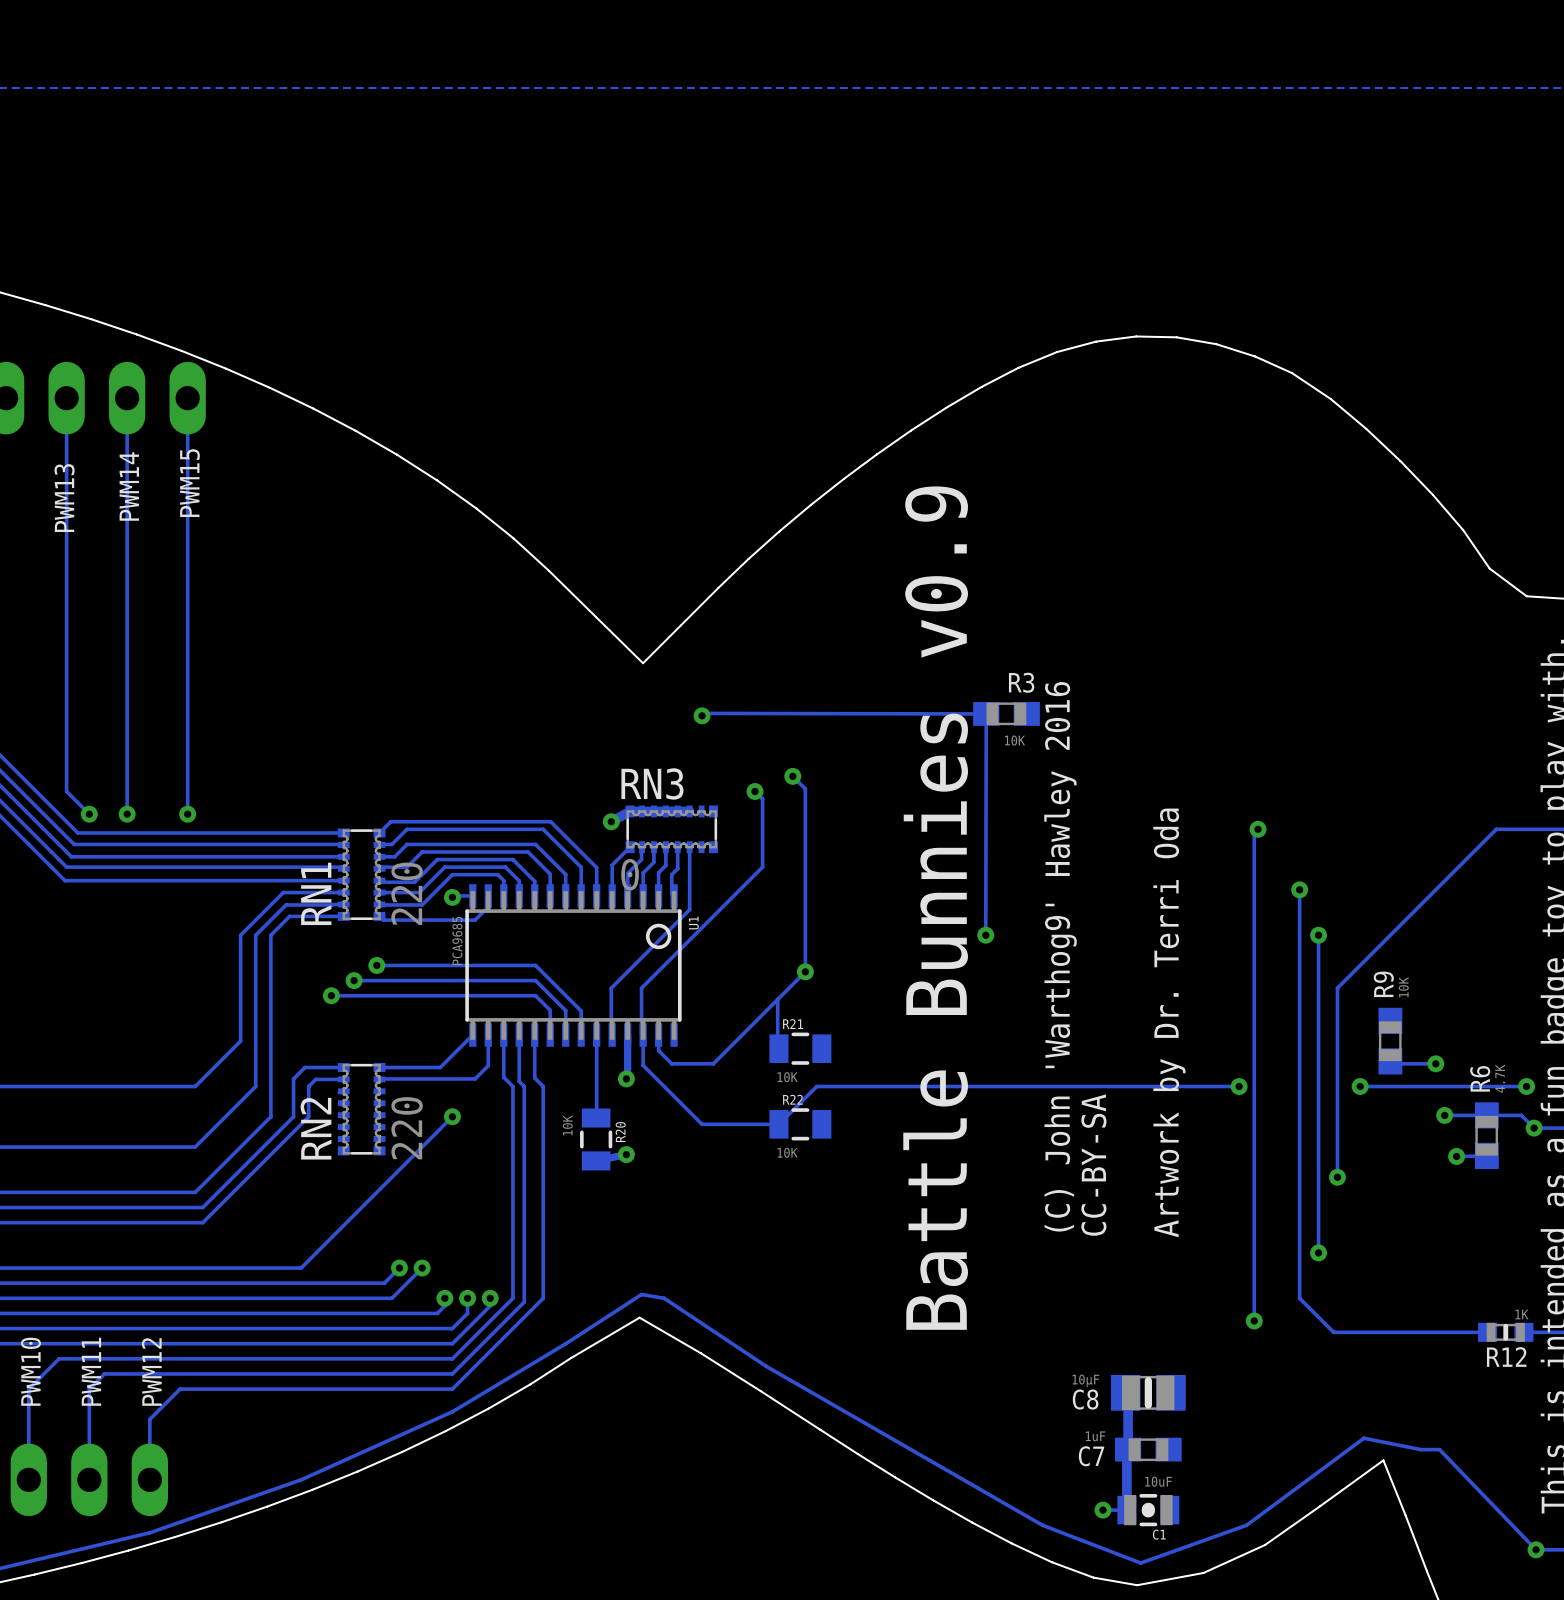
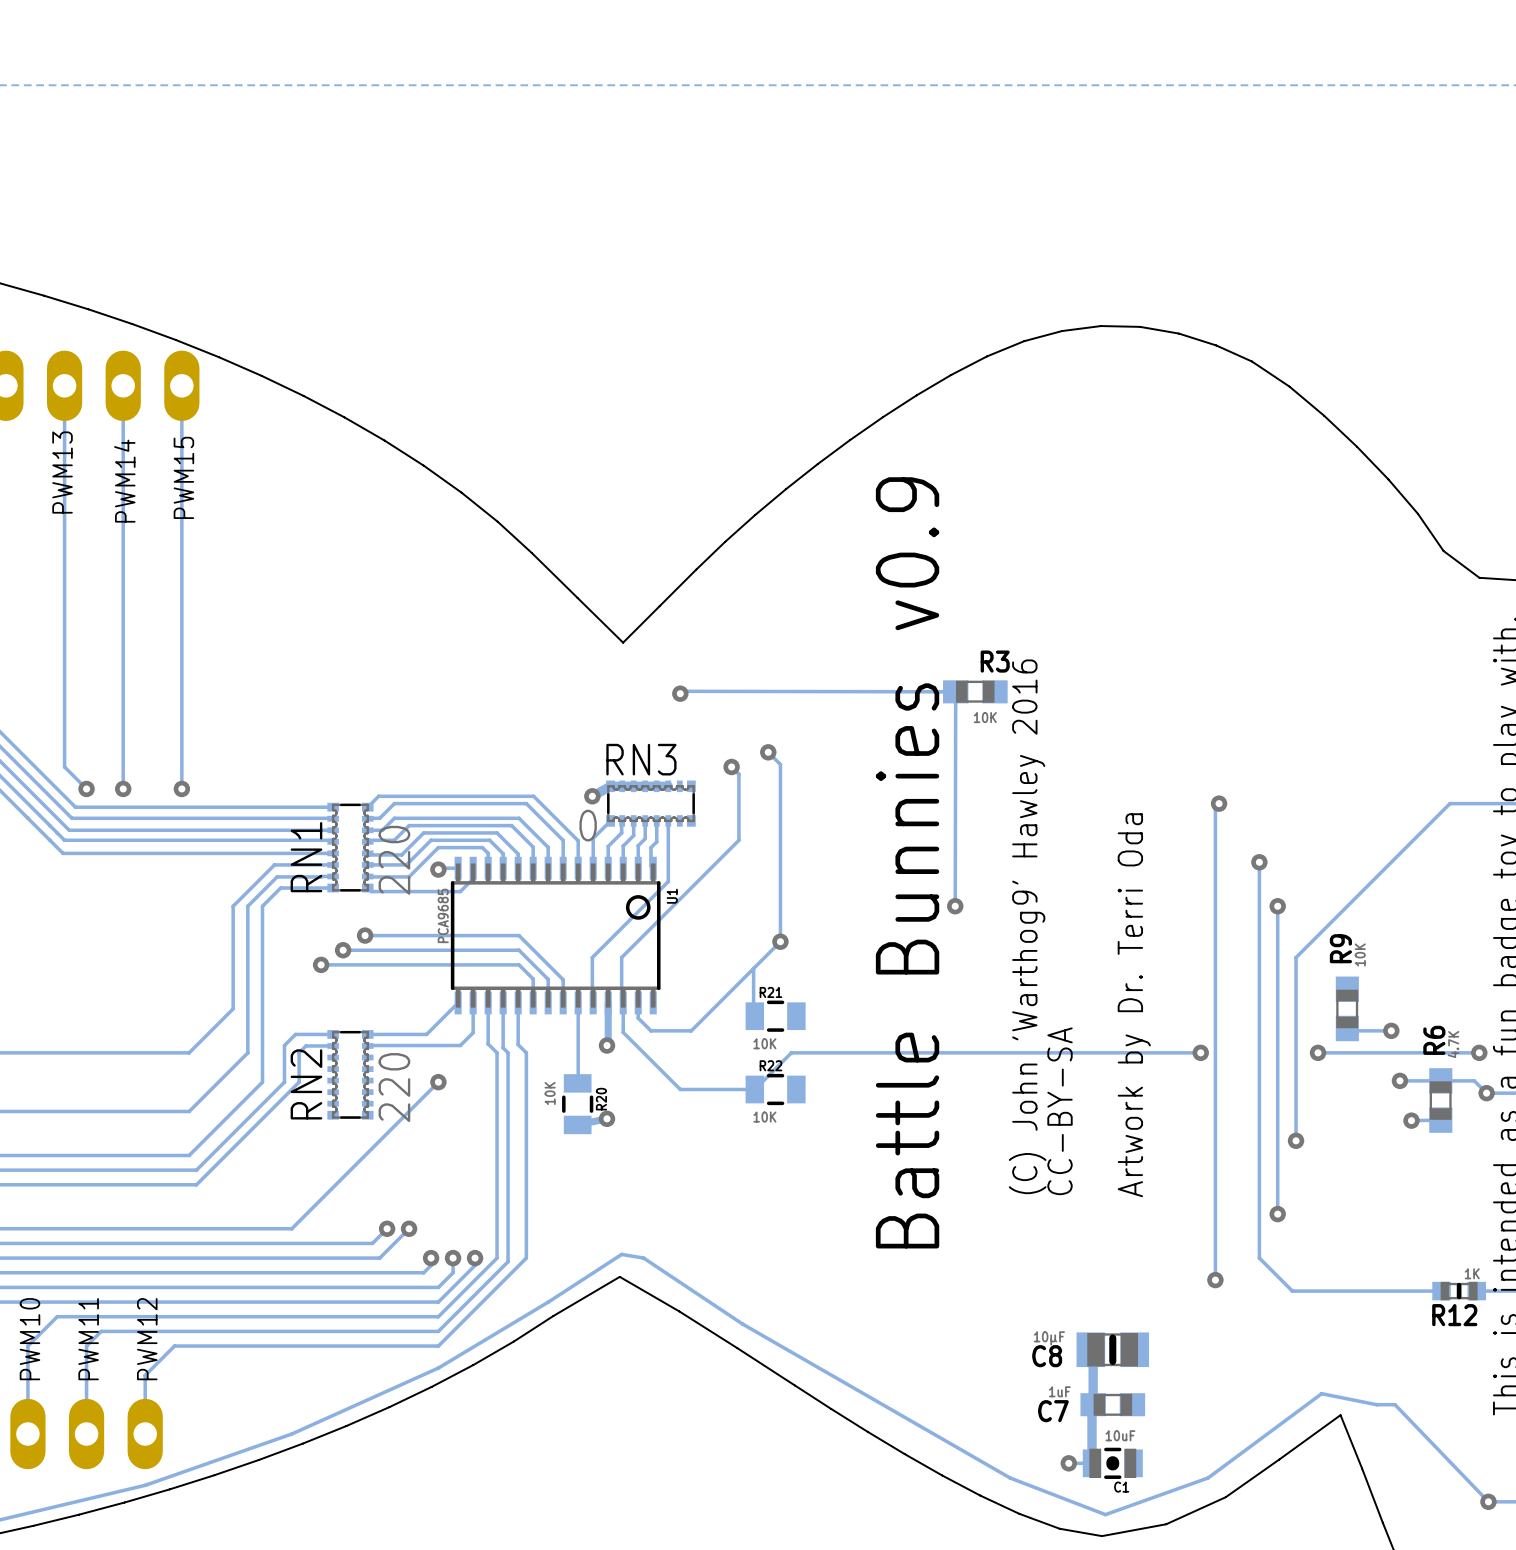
RN3 value position: 0 (630, 874) -> 0 (588, 825)

